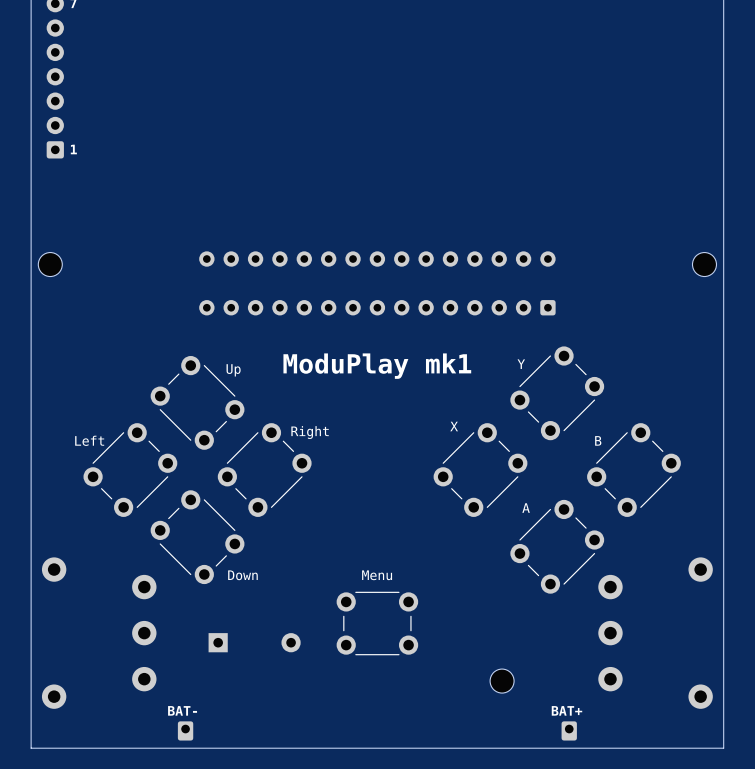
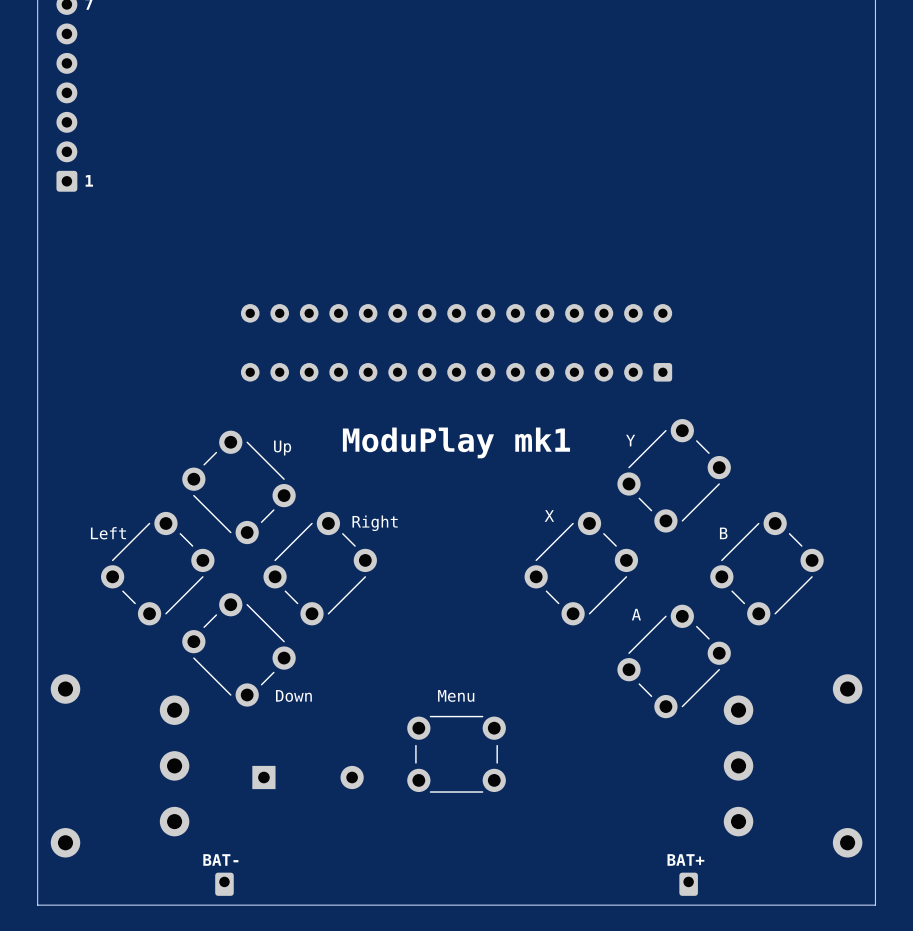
part: (50, 264) -> none
part: (704, 264) -> none
part: (502, 681) -> none

